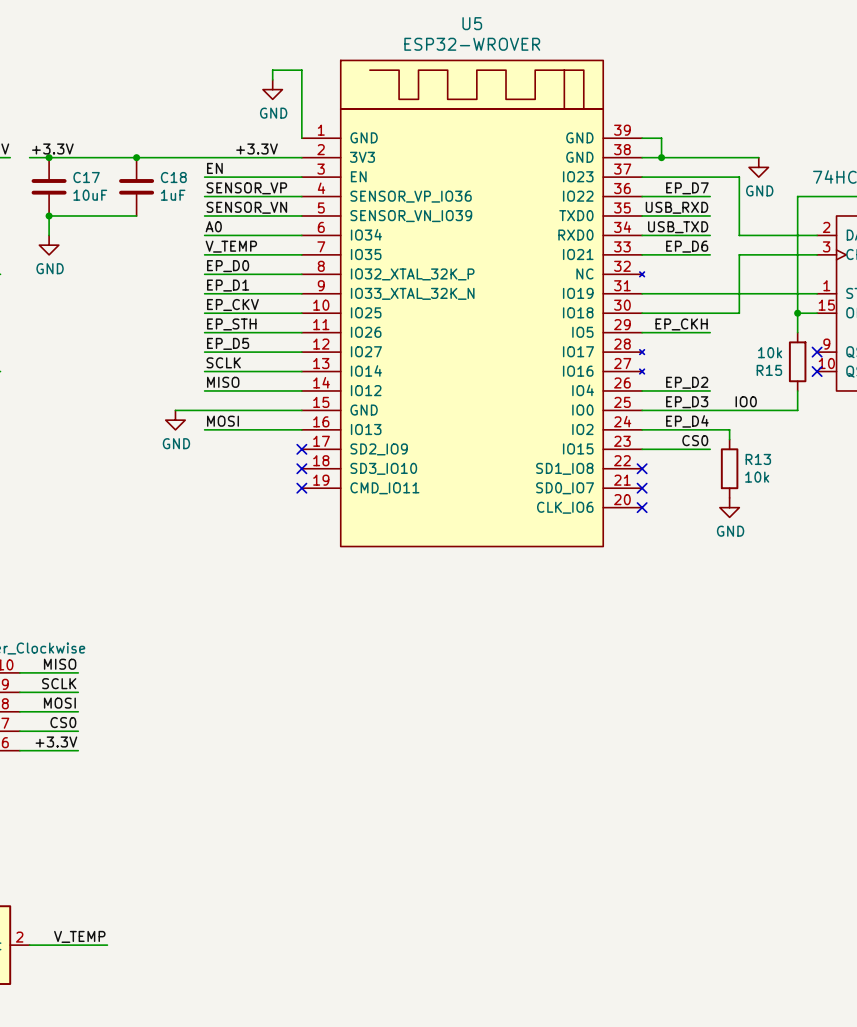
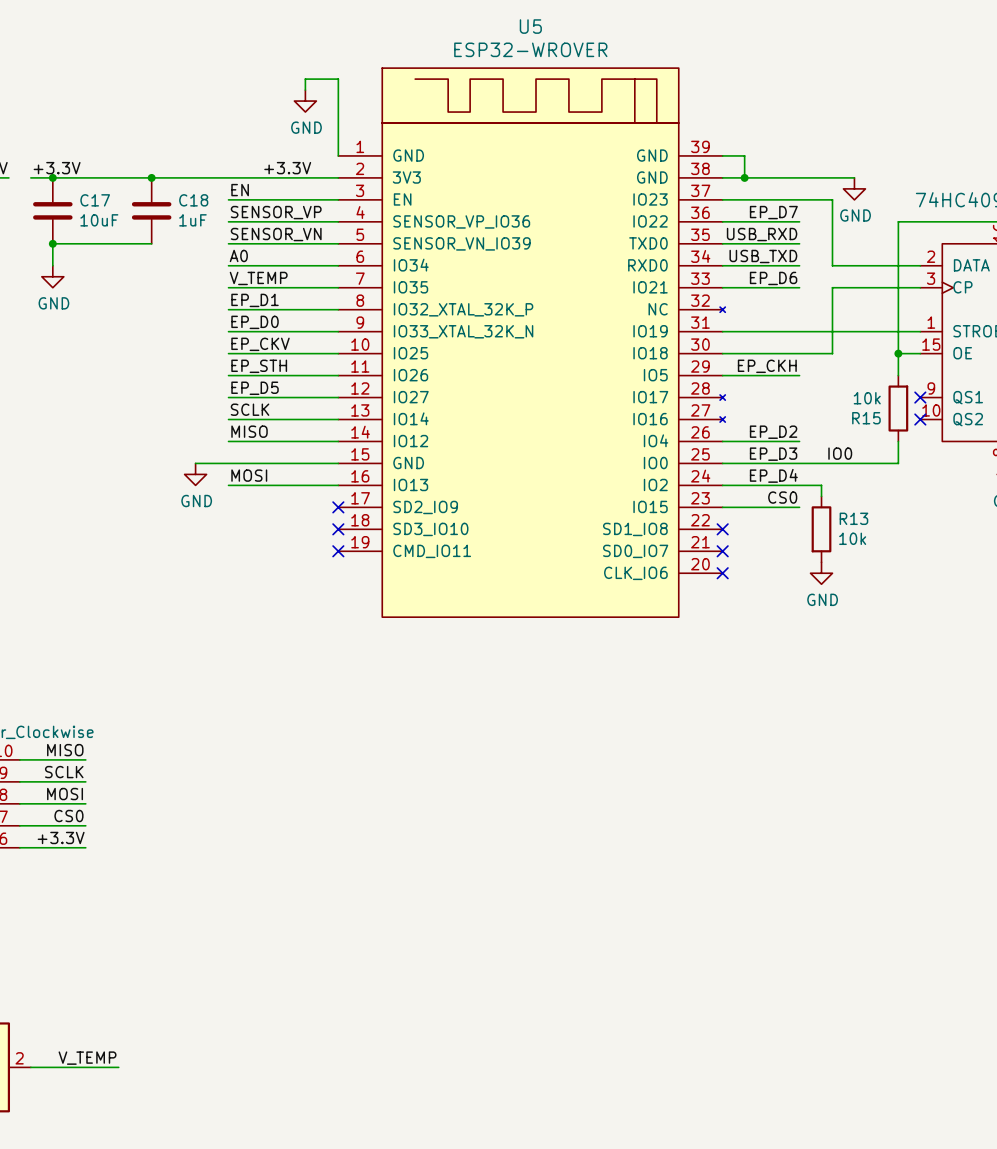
label: EP_D0 (228, 266) -> EP_D1 (255, 300)
label: EP_D1 (228, 285) -> EP_D0 (255, 322)

